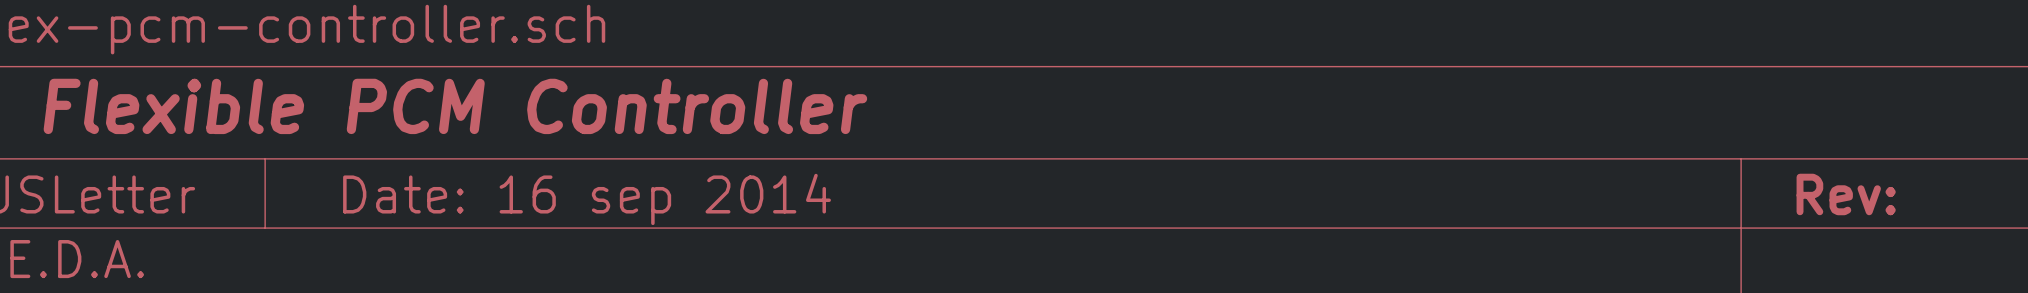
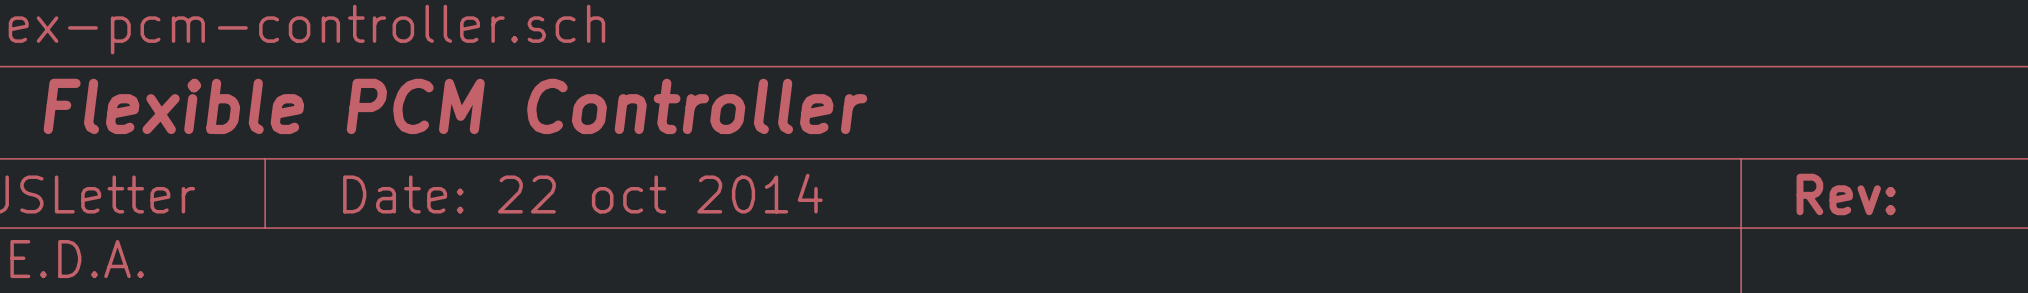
title block: Date: 16 sep 2014 (587, 199) -> Date: 22 oct 2014 (582, 193)

